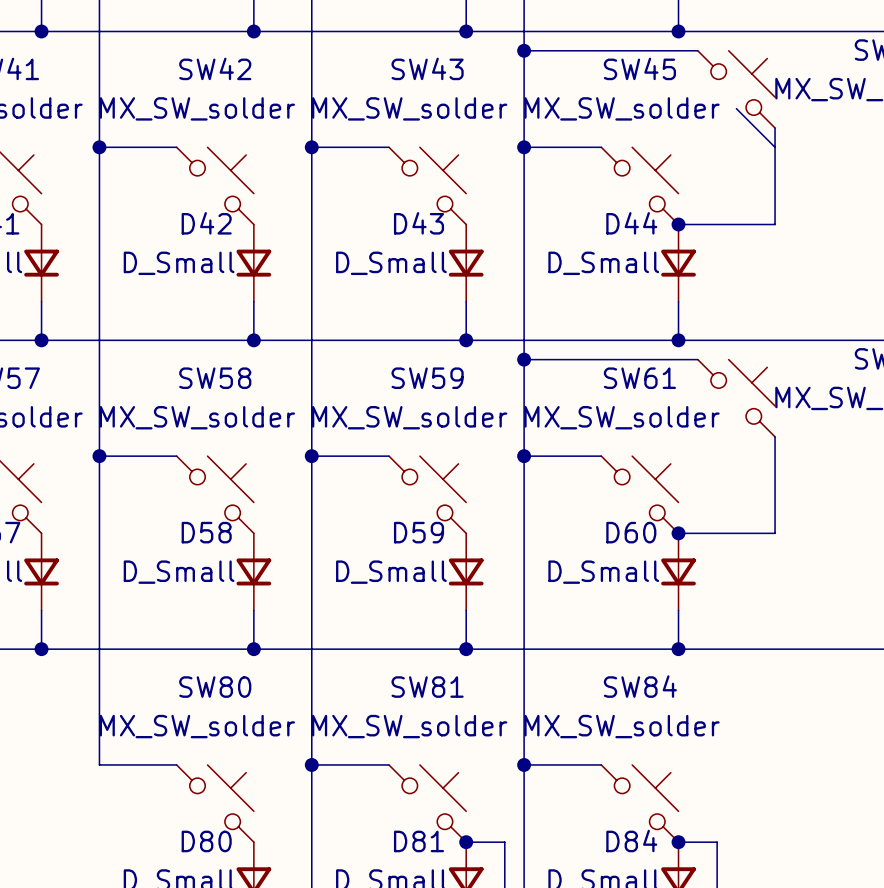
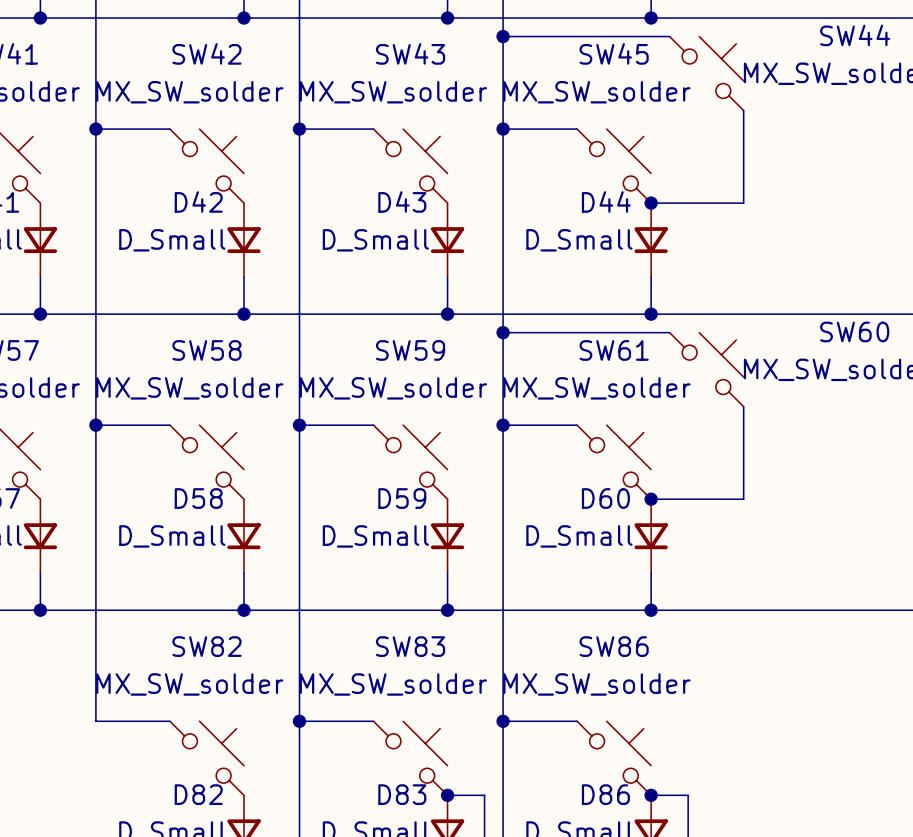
wire: (736, 108) (775, 147) -> none
SW84 name: SW84 (640, 686) -> SW86 (614, 646)
SW80 name: SW80 (215, 687) -> SW82 (206, 646)
SW81 name: SW81 (427, 687) -> SW83 (410, 646)
D80 name: D80 (206, 841) -> D82 (198, 794)
D81 name: D81 (419, 841) -> D83 (402, 794)
D84 name: D84 (631, 841) -> D86 (605, 794)

